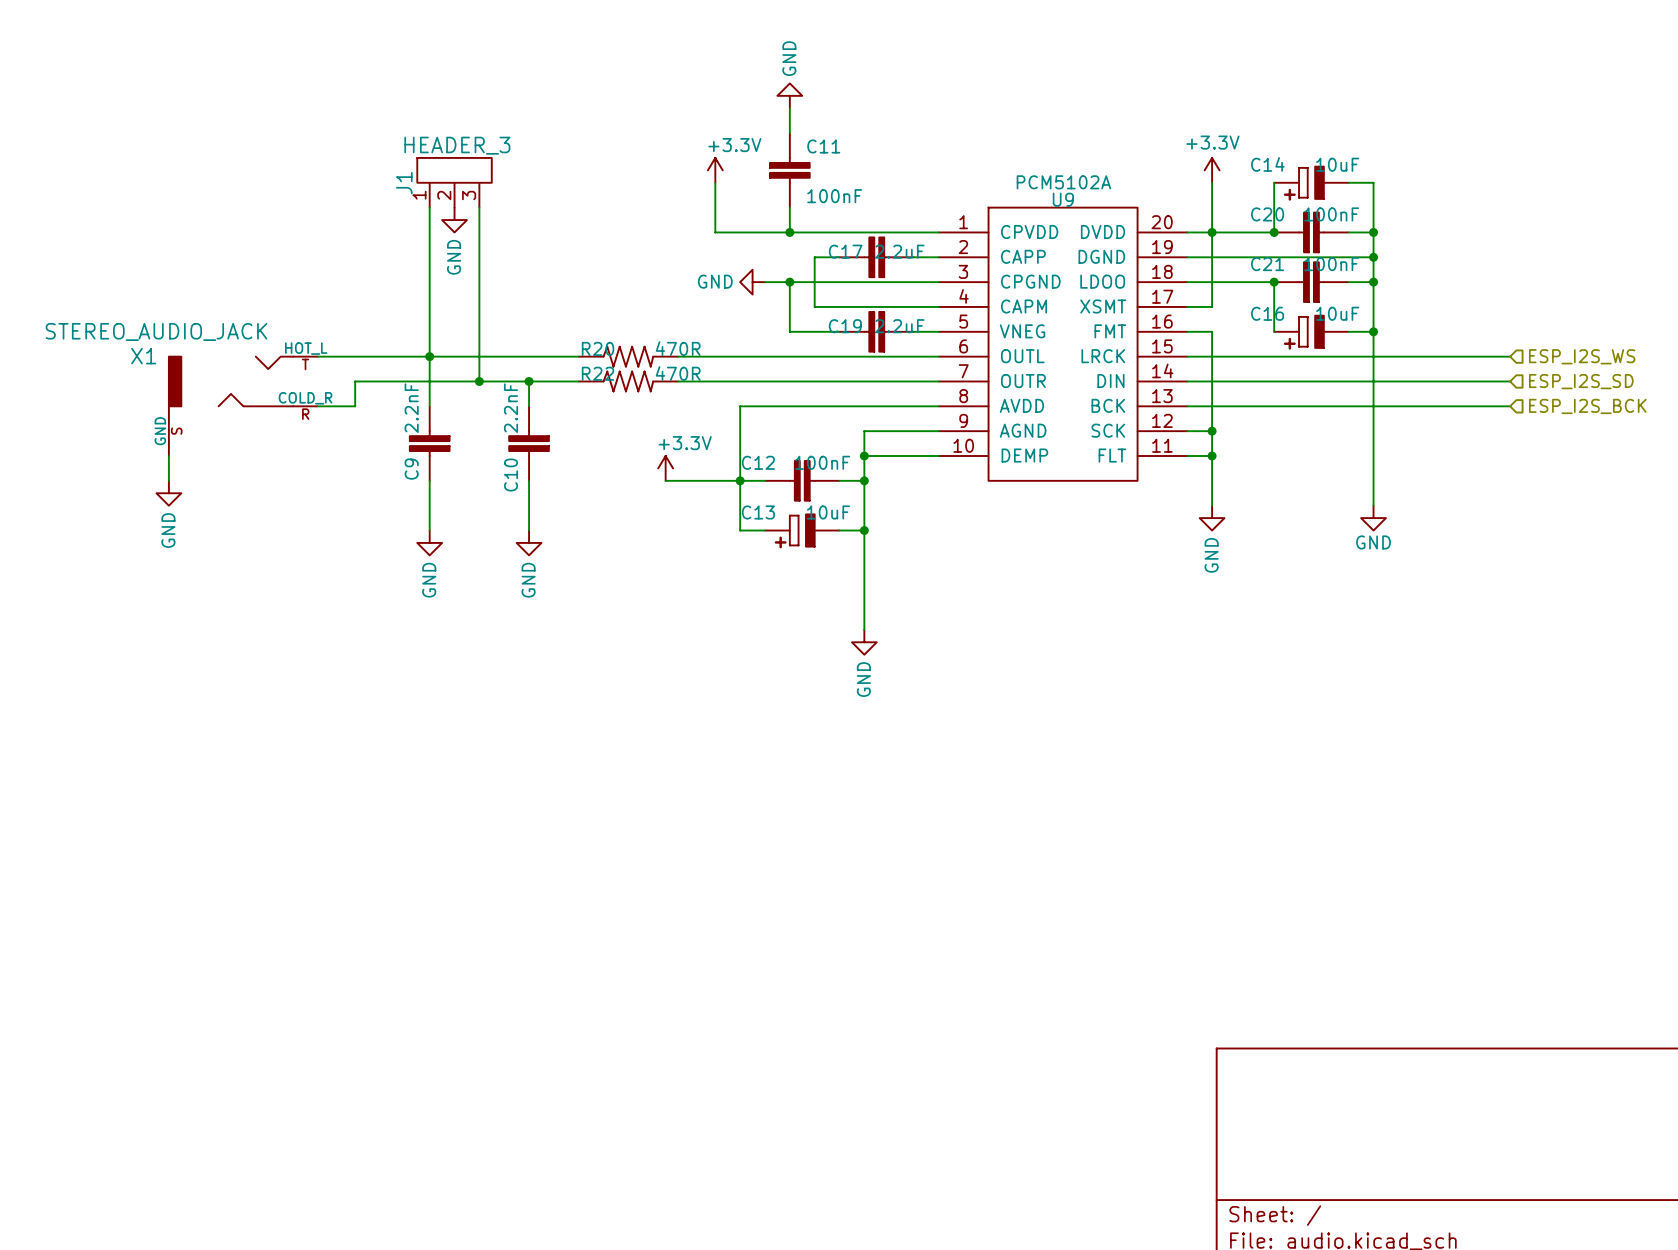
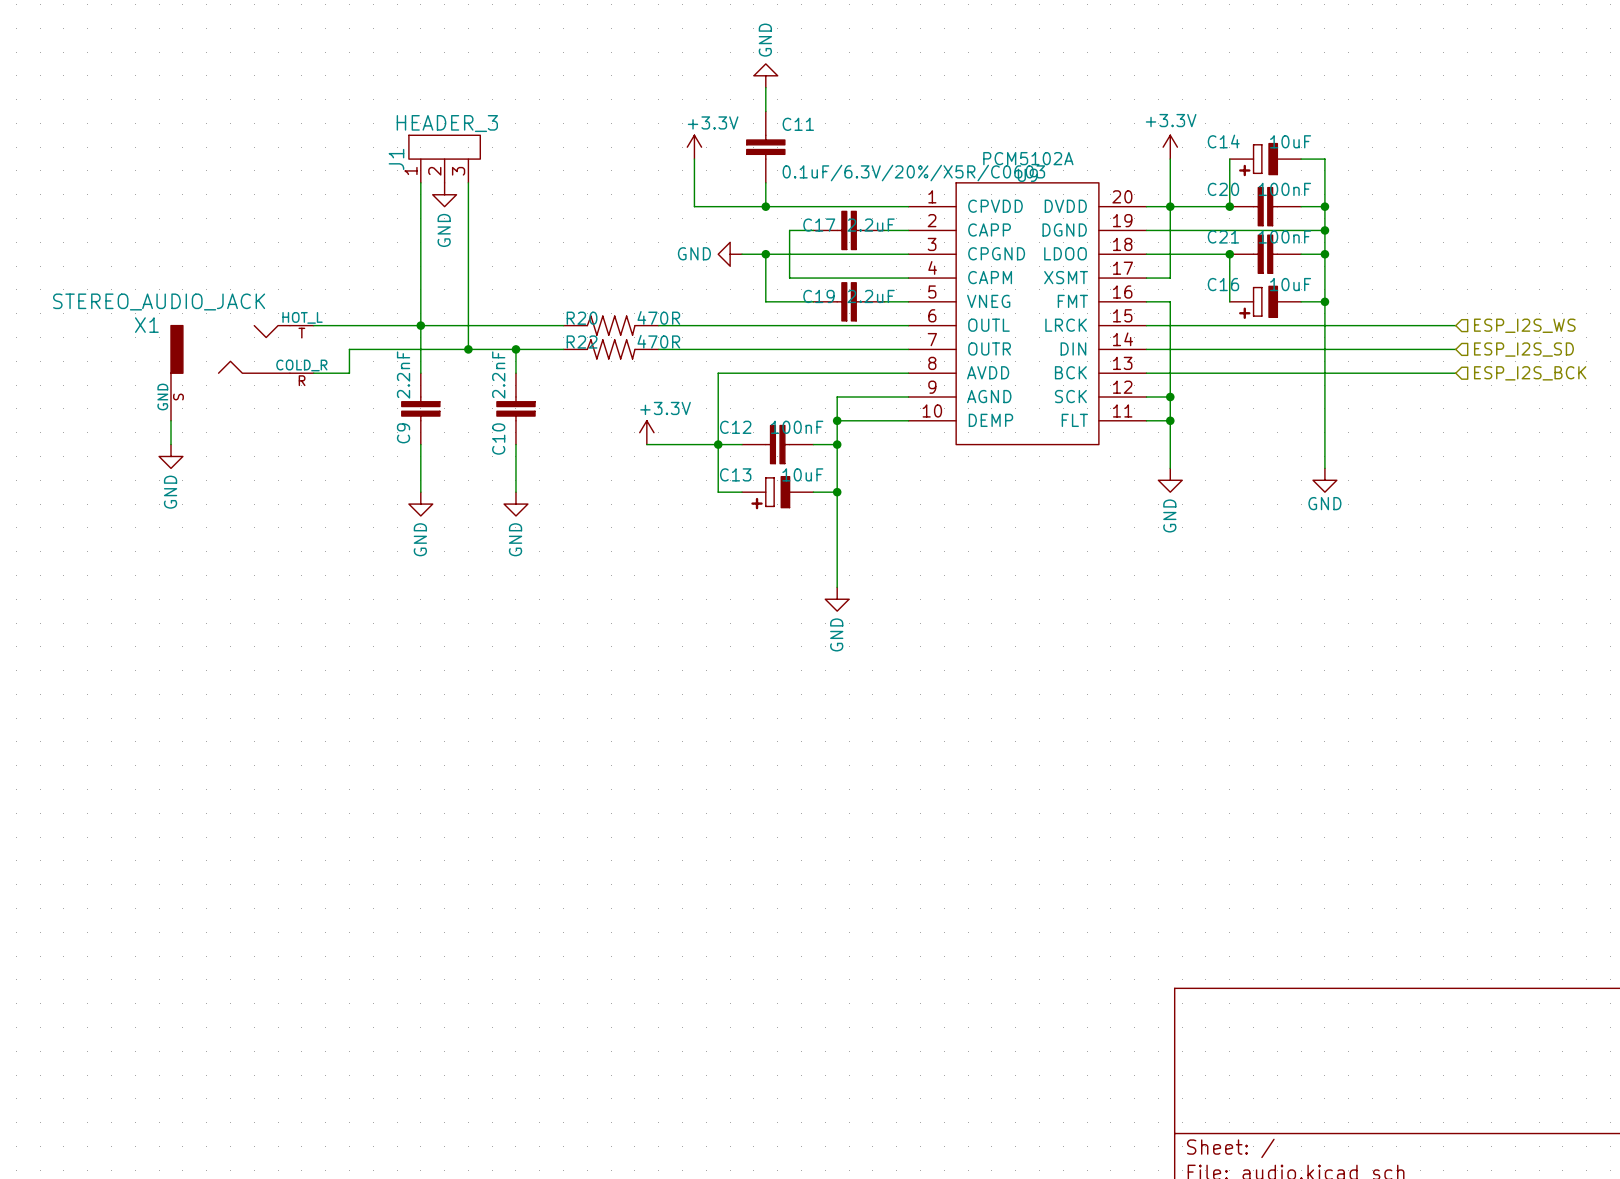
C11 value: 100nF (834, 196) -> 0.1uF/6.3V/20%/X5R/C0603 (913, 173)

